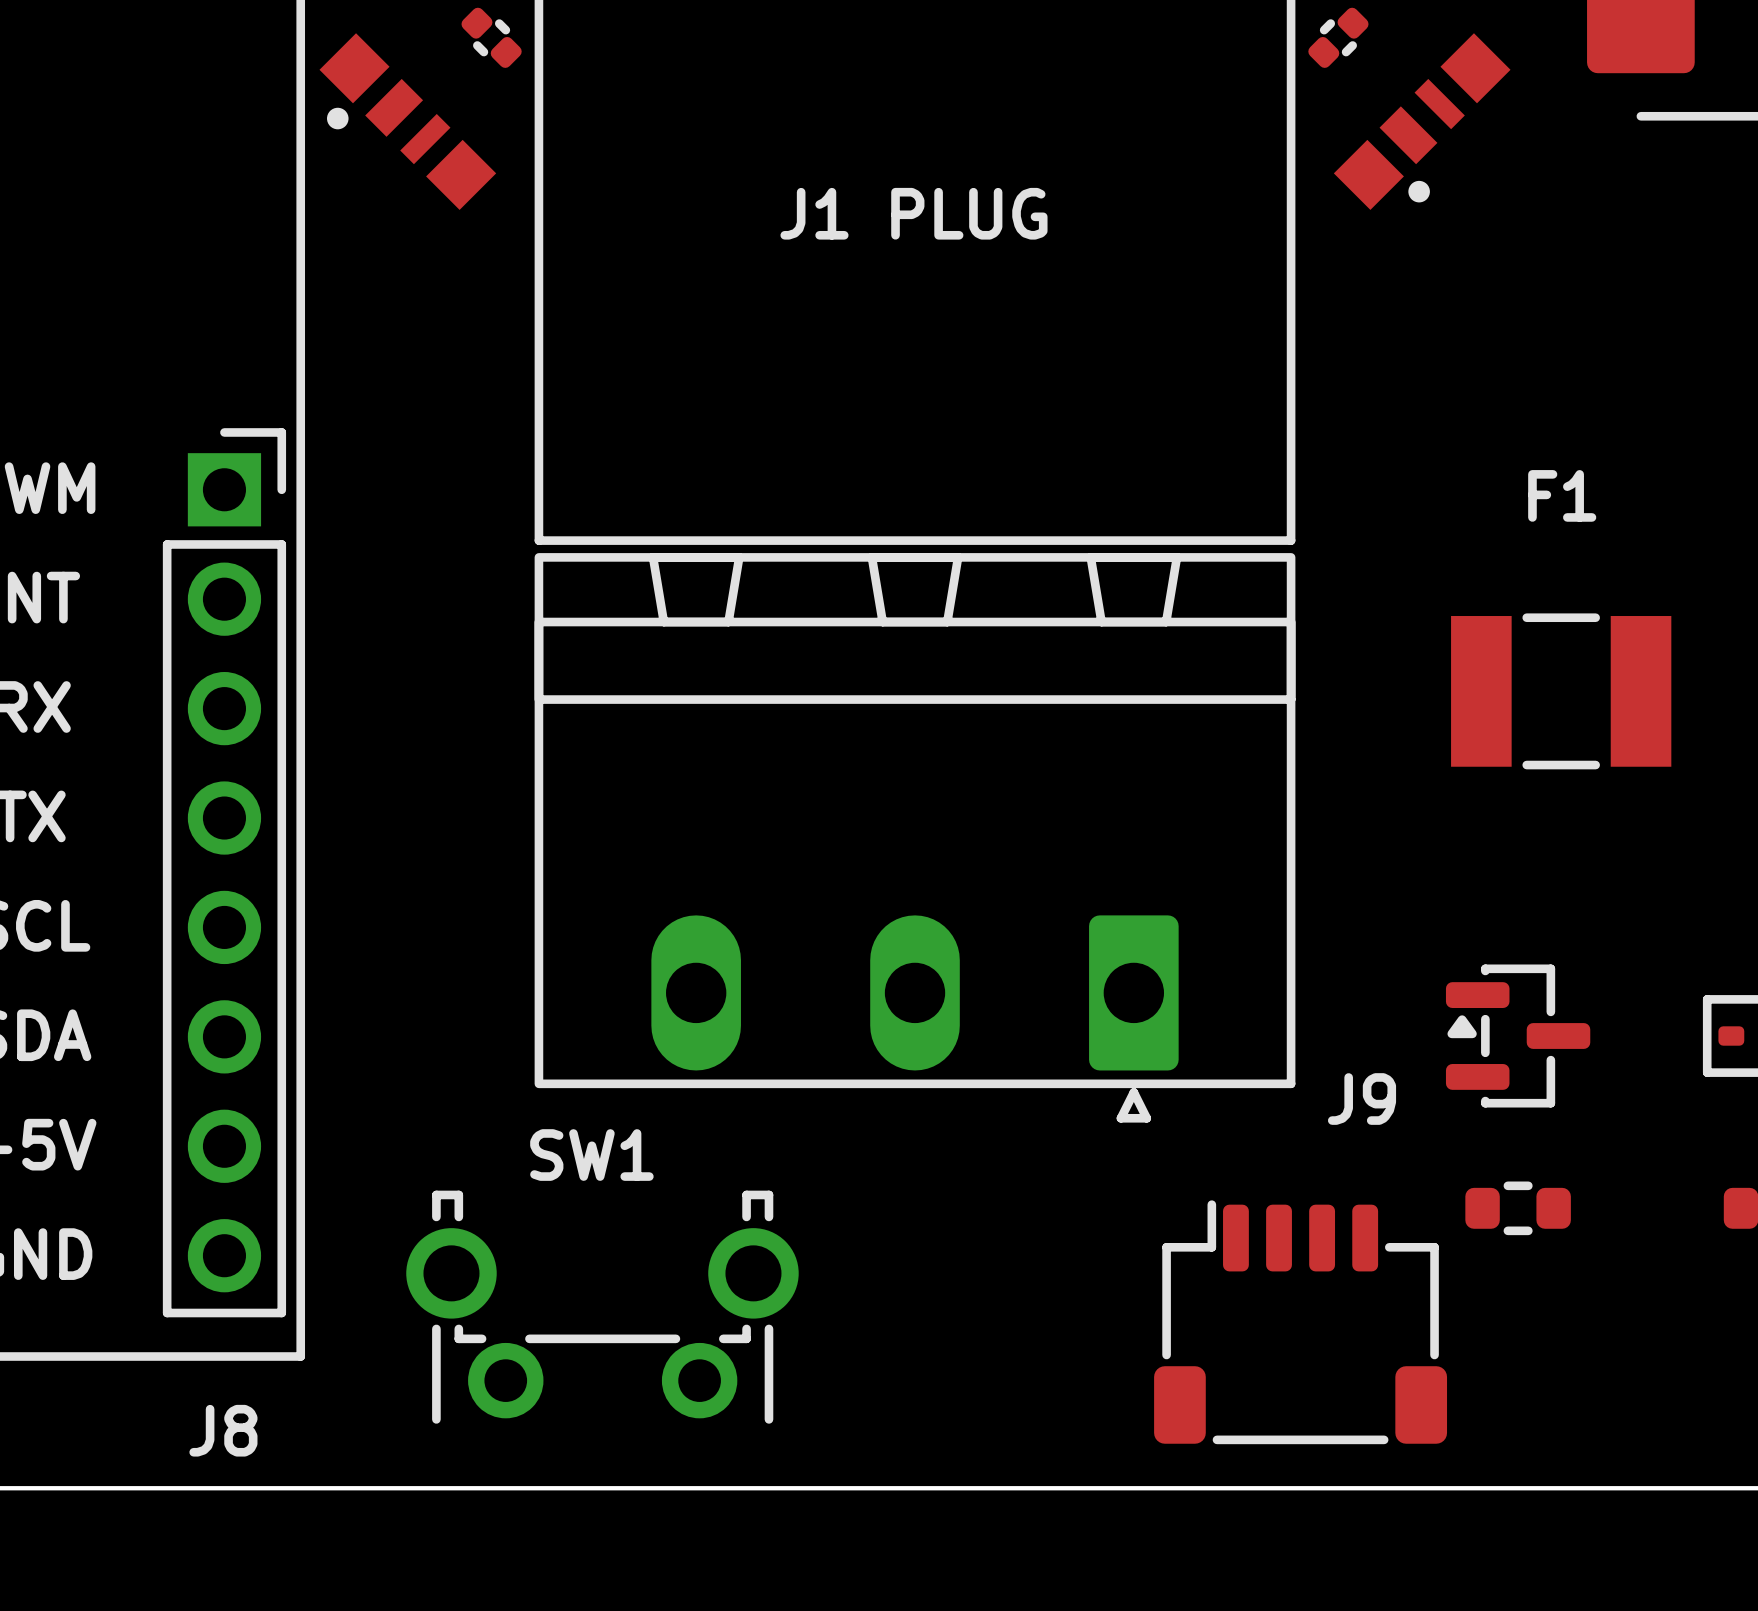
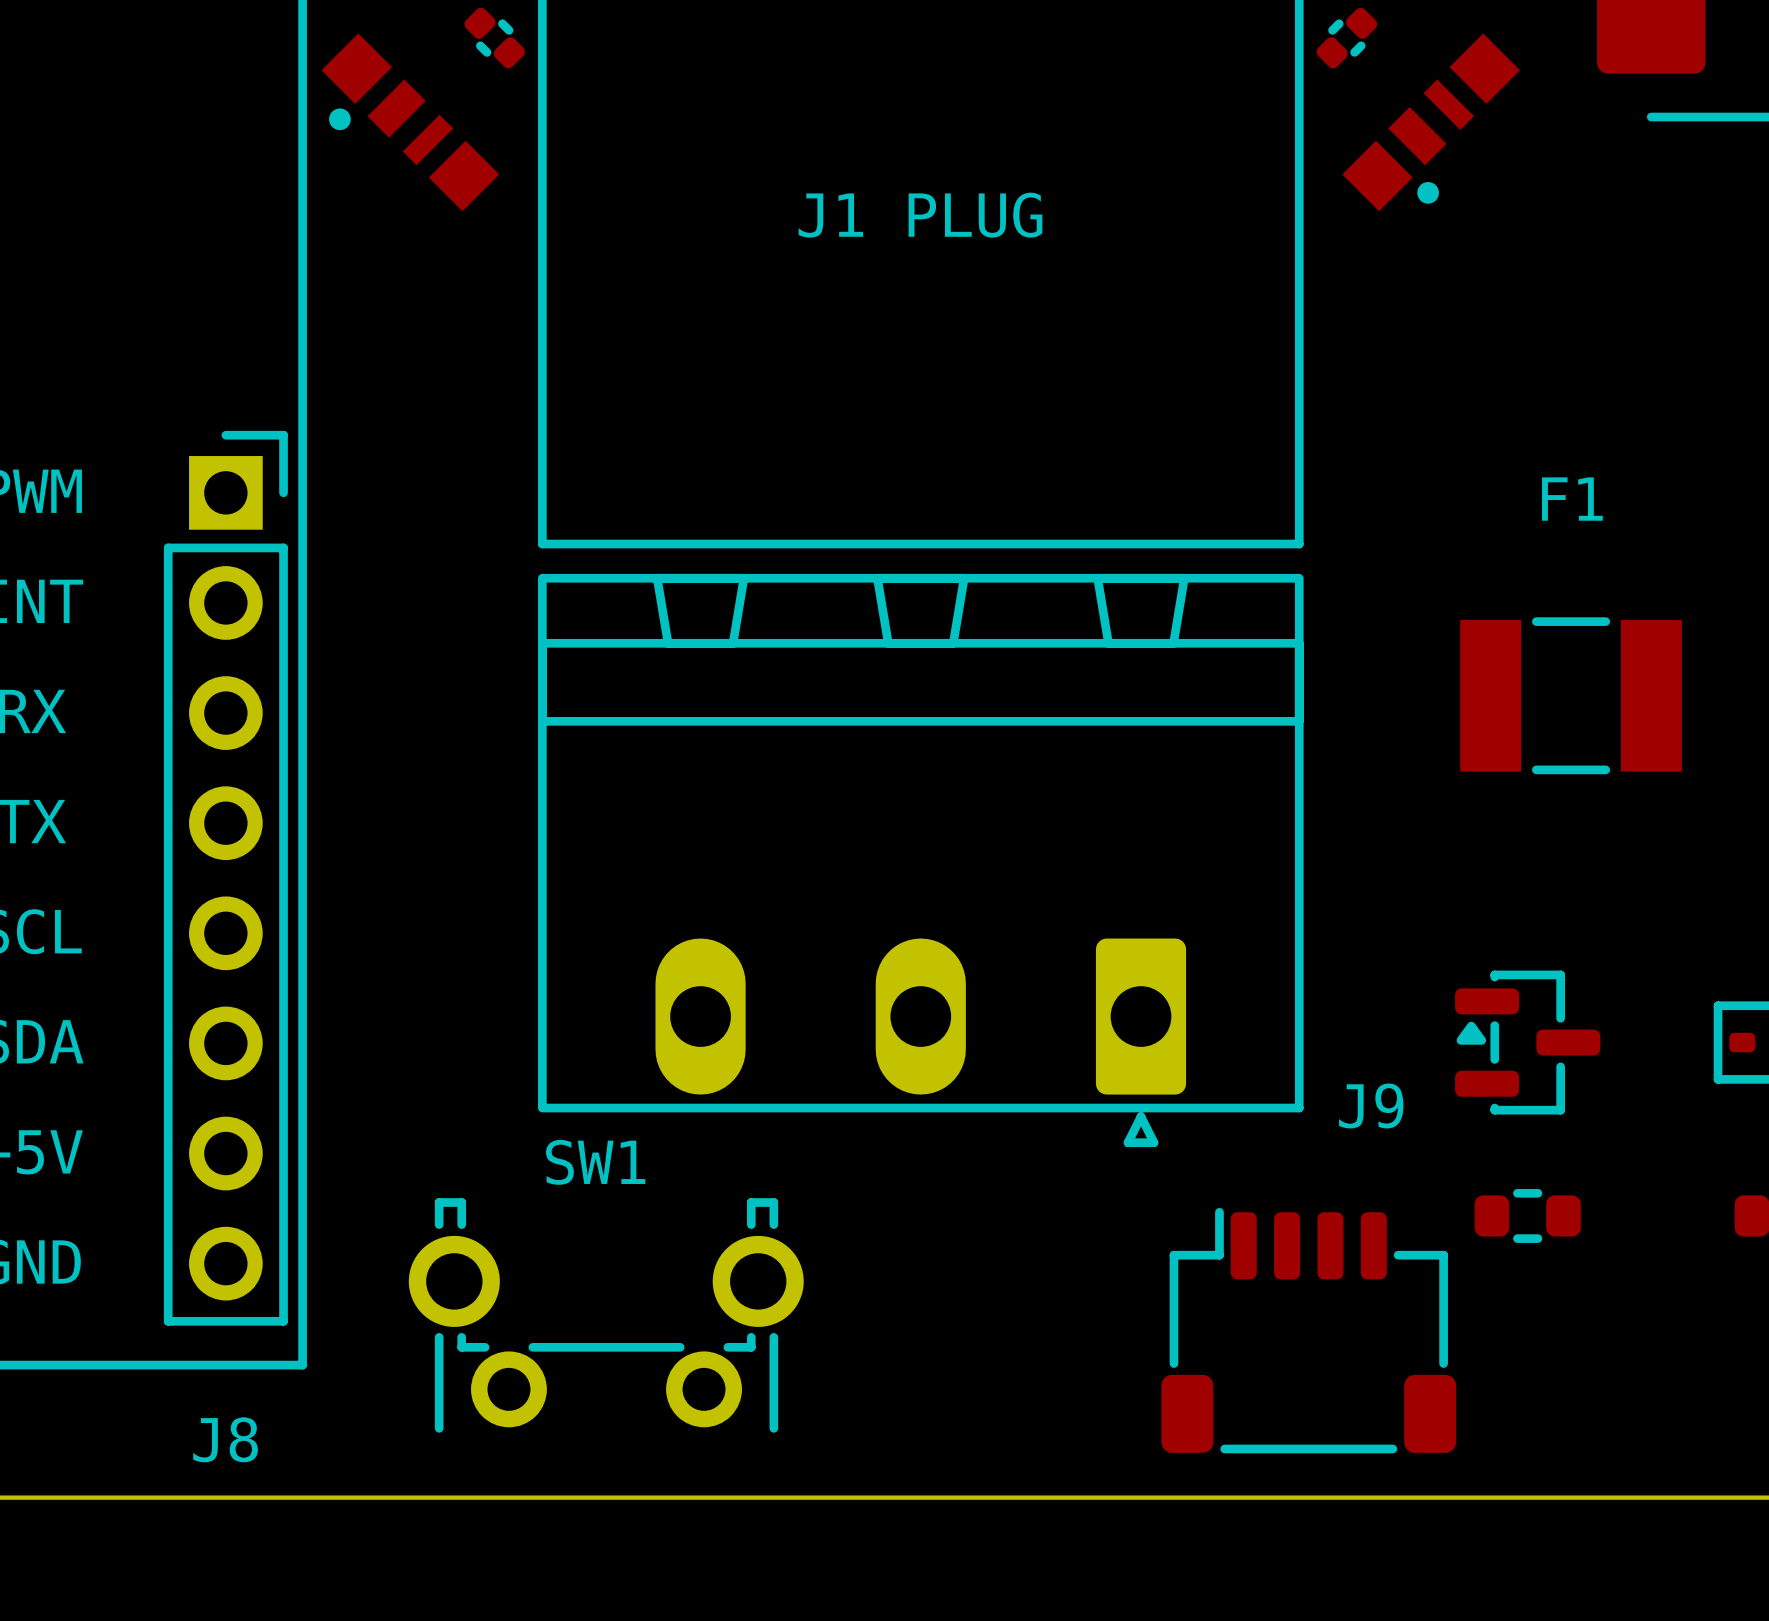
part position: (915, 837) -> (920, 860)

